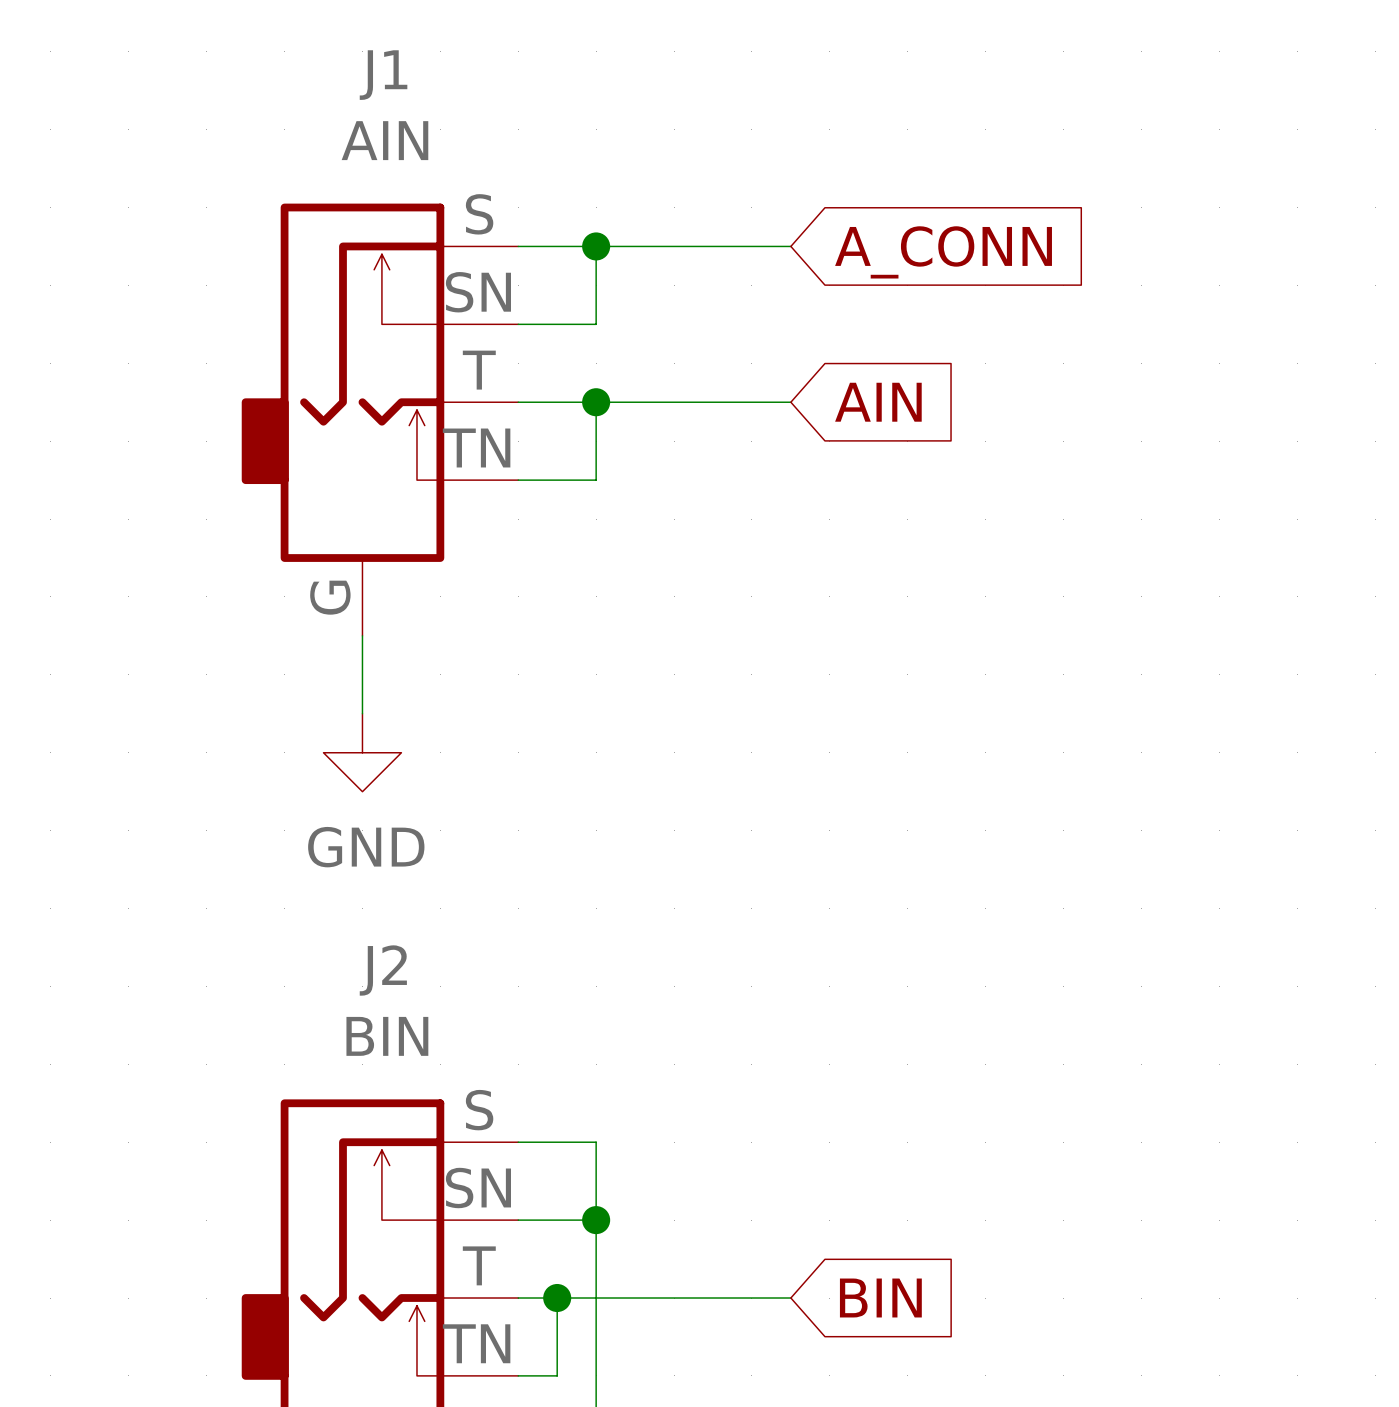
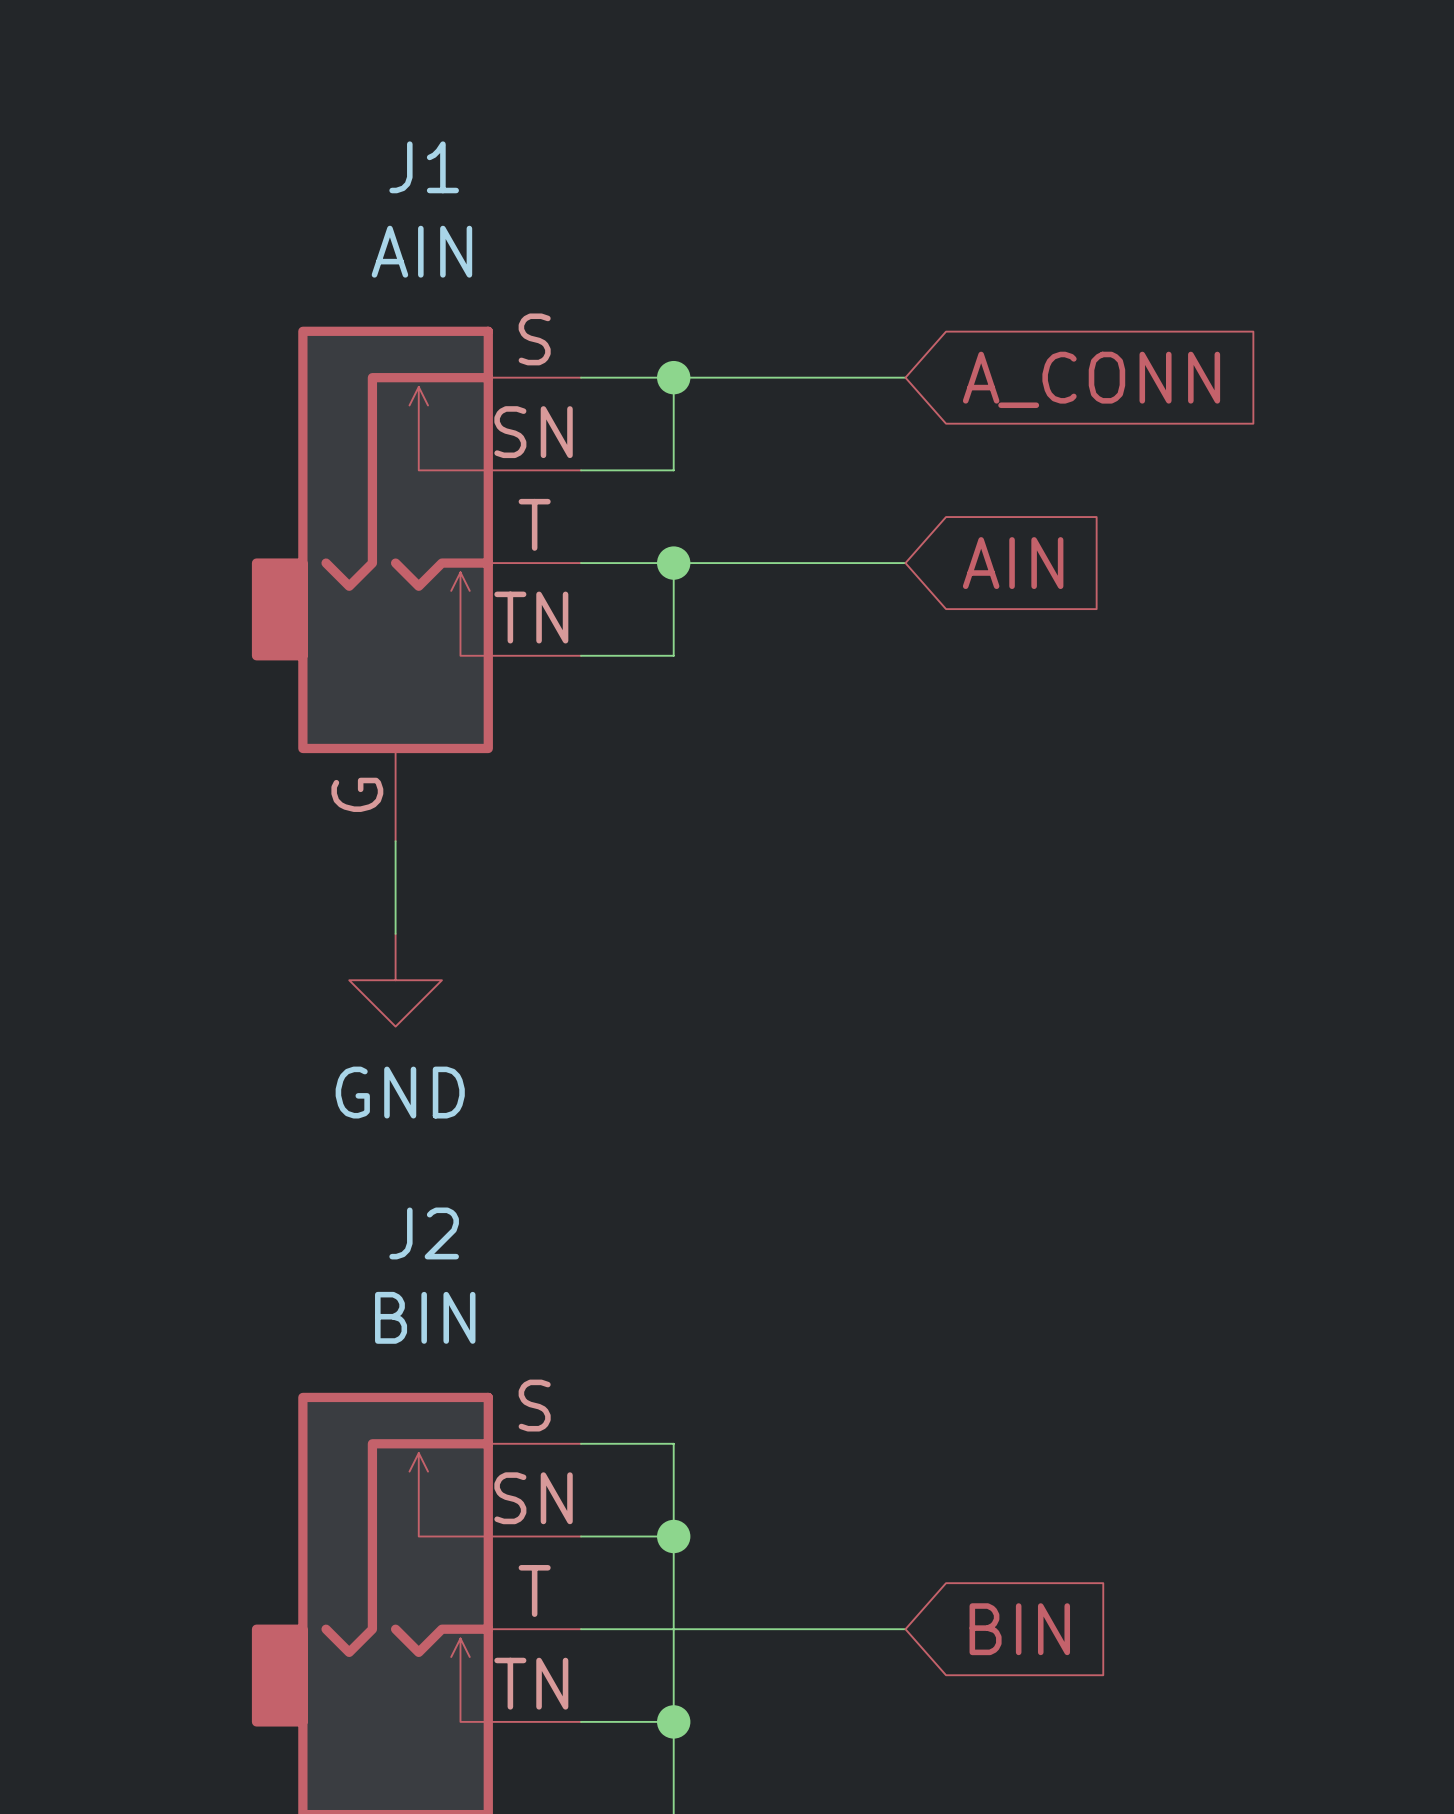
wire: (557, 1298) (557, 1375) -> (673, 1721) (627, 1721)
junction position: (557, 1298) -> (673, 1721)

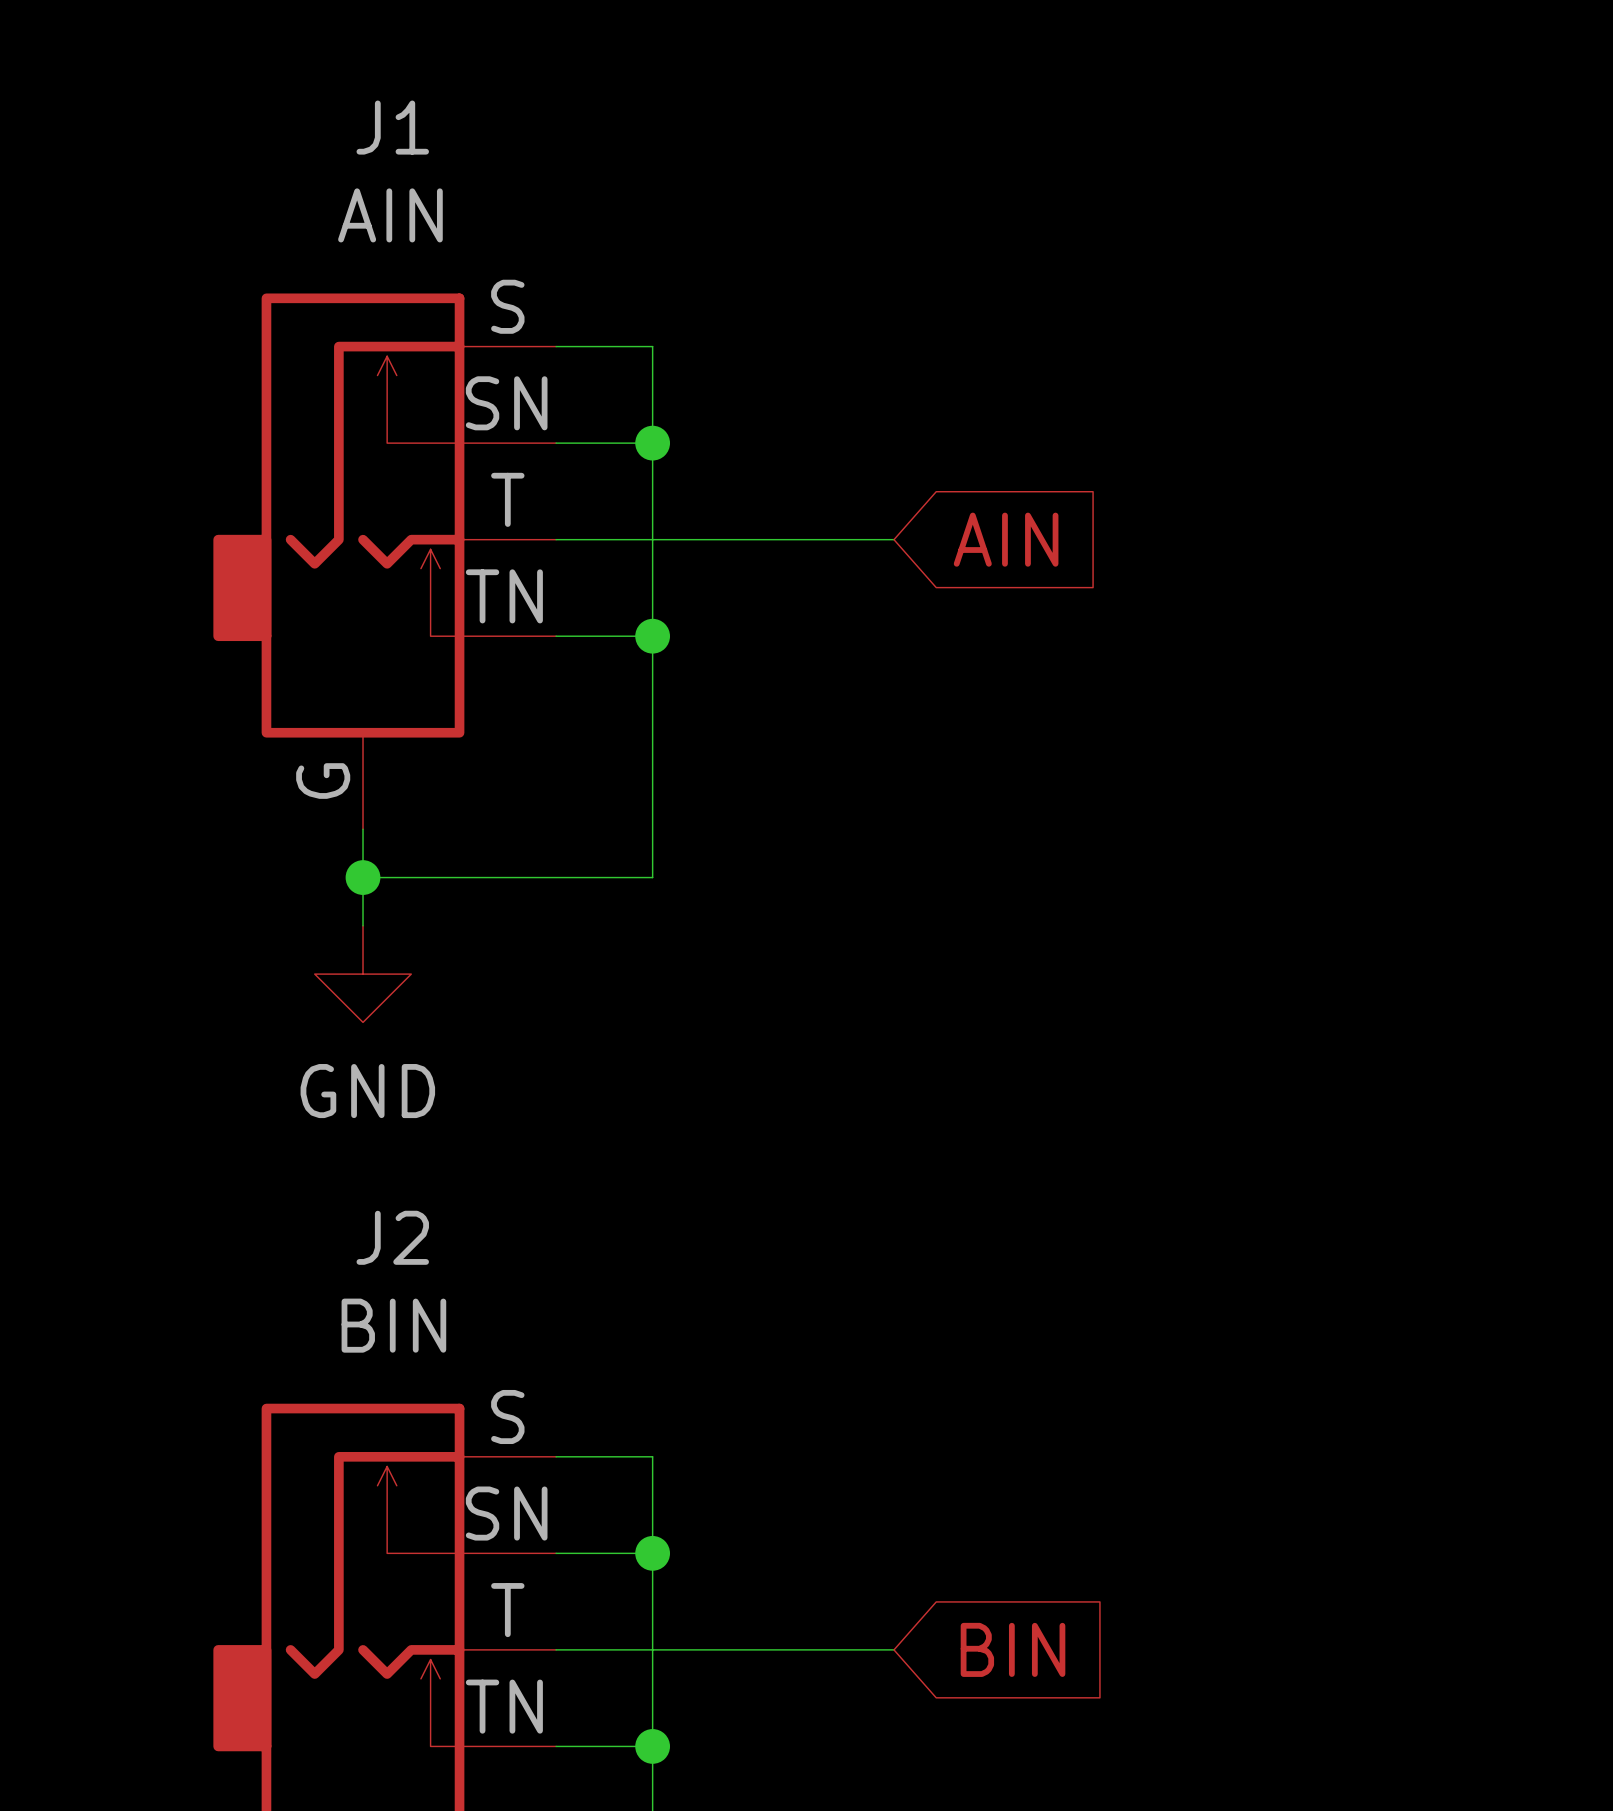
wire: (673, 377) (905, 377) -> none
junction: (673, 377) -> none
global label: A_CONN (1091, 379) -> none
wire: none -> (652, 443) (652, 539)
junction: none -> (652, 443)
junction: (673, 563) -> none
wire: none -> (652, 636) (652, 877) (363, 877)
junction: none -> (652, 636)
junction: none -> (363, 877)

